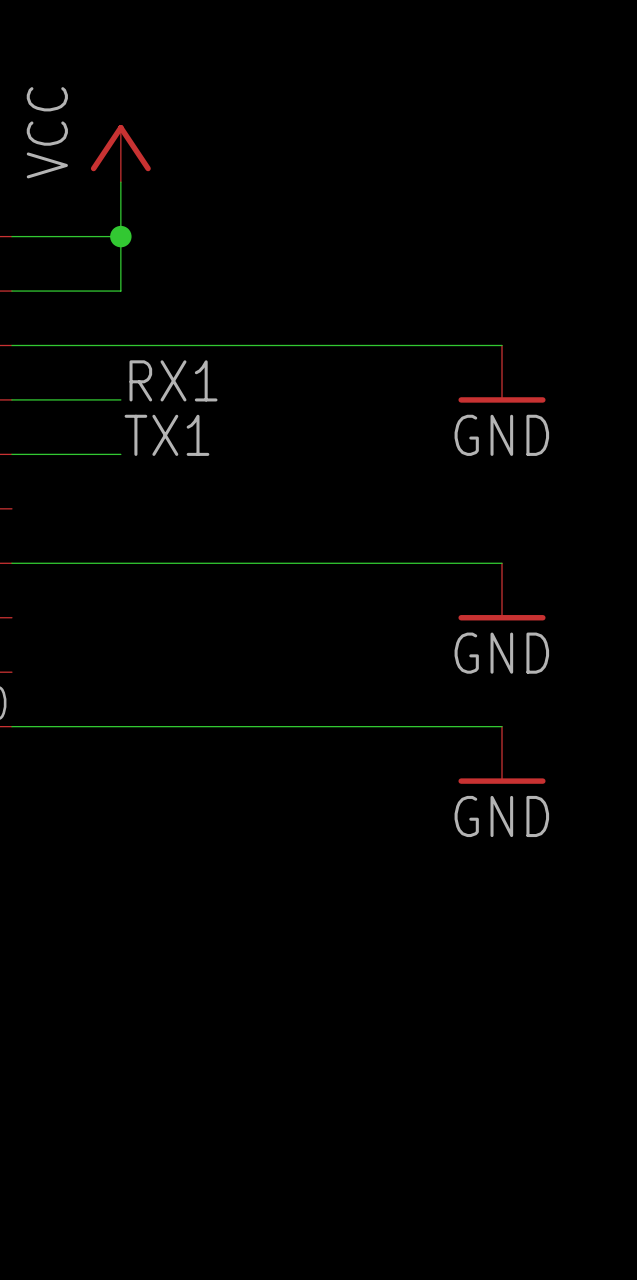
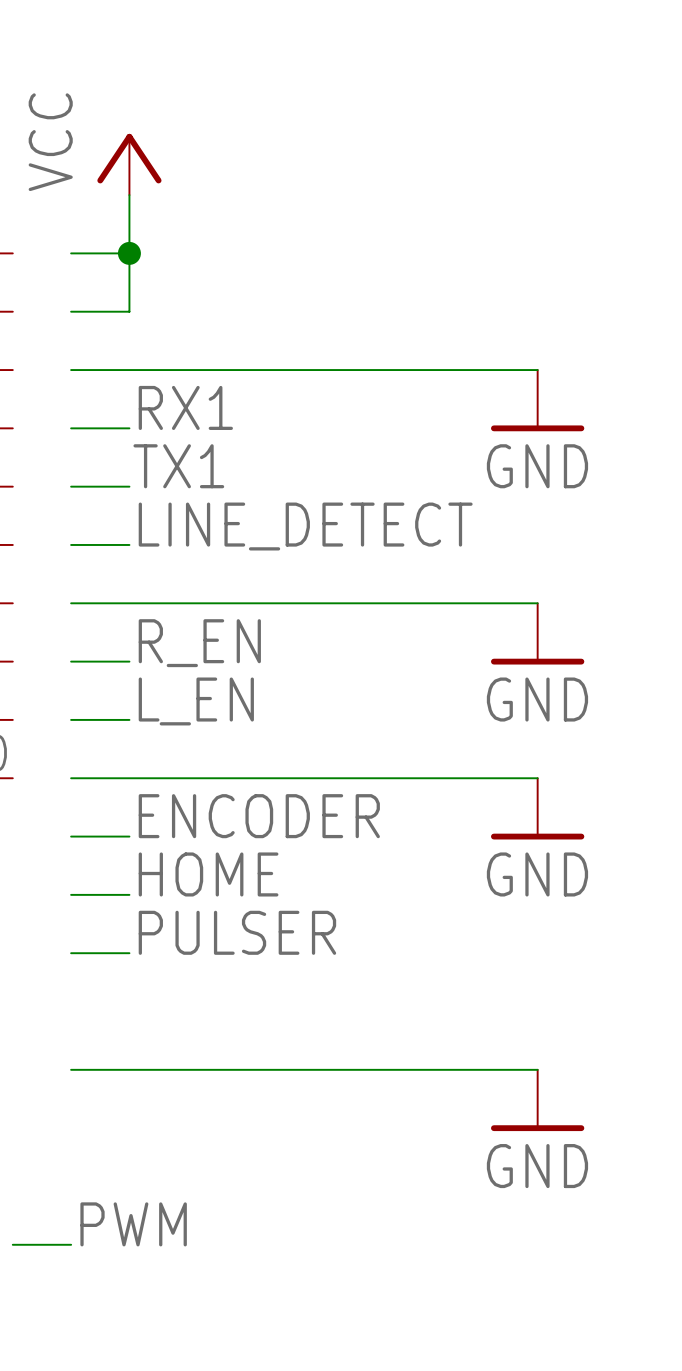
wire: (11, 236) (66, 236) -> (71, 544) (129, 544)
wire: (11, 291) (66, 291) -> none
wire: (11, 345) (66, 345) -> (71, 661) (129, 661)
wire: (11, 399) (66, 399) -> (71, 719) (129, 719)
wire: (11, 454) (66, 454) -> (71, 836) (129, 836)
label: none -> LINE_DETECT (305, 526)
wire: (11, 563) (66, 563) -> (71, 894) (129, 894)
label: none -> R_EN (199, 643)
label: none -> L_EN (196, 701)
wire: (11, 726) (66, 726) -> (71, 953) (129, 953)
label: none -> ENCODER (259, 816)
label: none -> HOME (208, 874)
label: none -> PULSER (237, 932)
wire: none -> (71, 1069) (537, 1069)
power symbol: none -> GND (537, 1100)
label: none -> PWM (133, 1224)
wire: none -> (12, 1244) (71, 1244)

